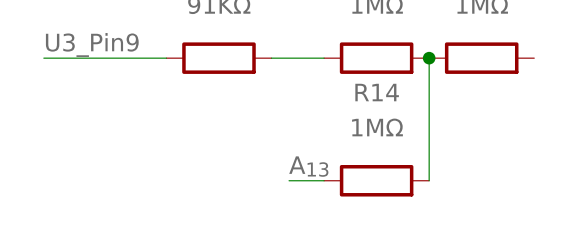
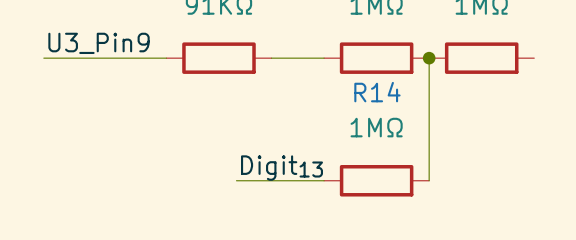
label: A13 (308, 166) -> Digit13 (282, 168)
wire: none -> (236, 180) (289, 180)

